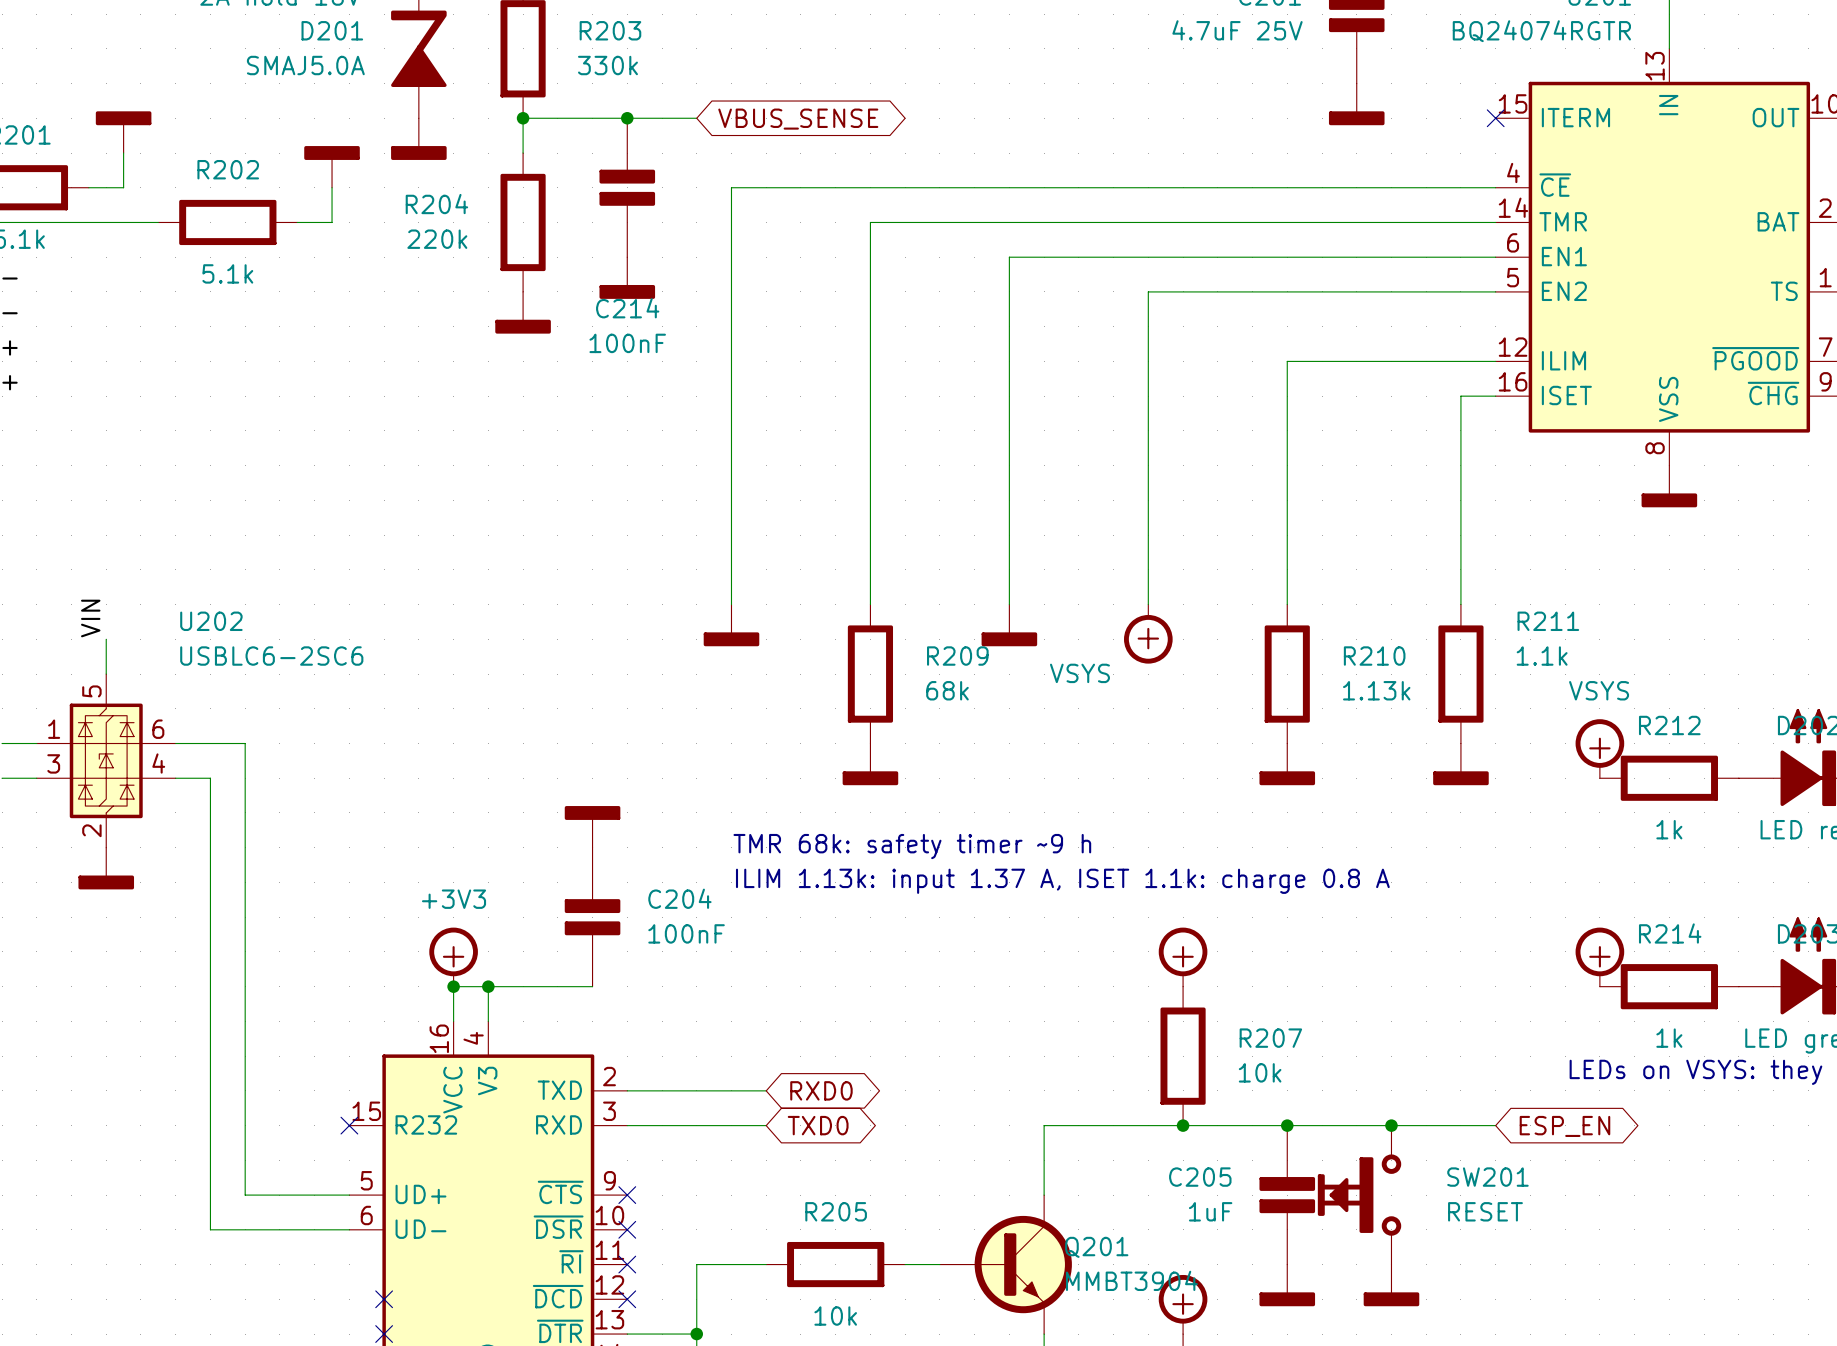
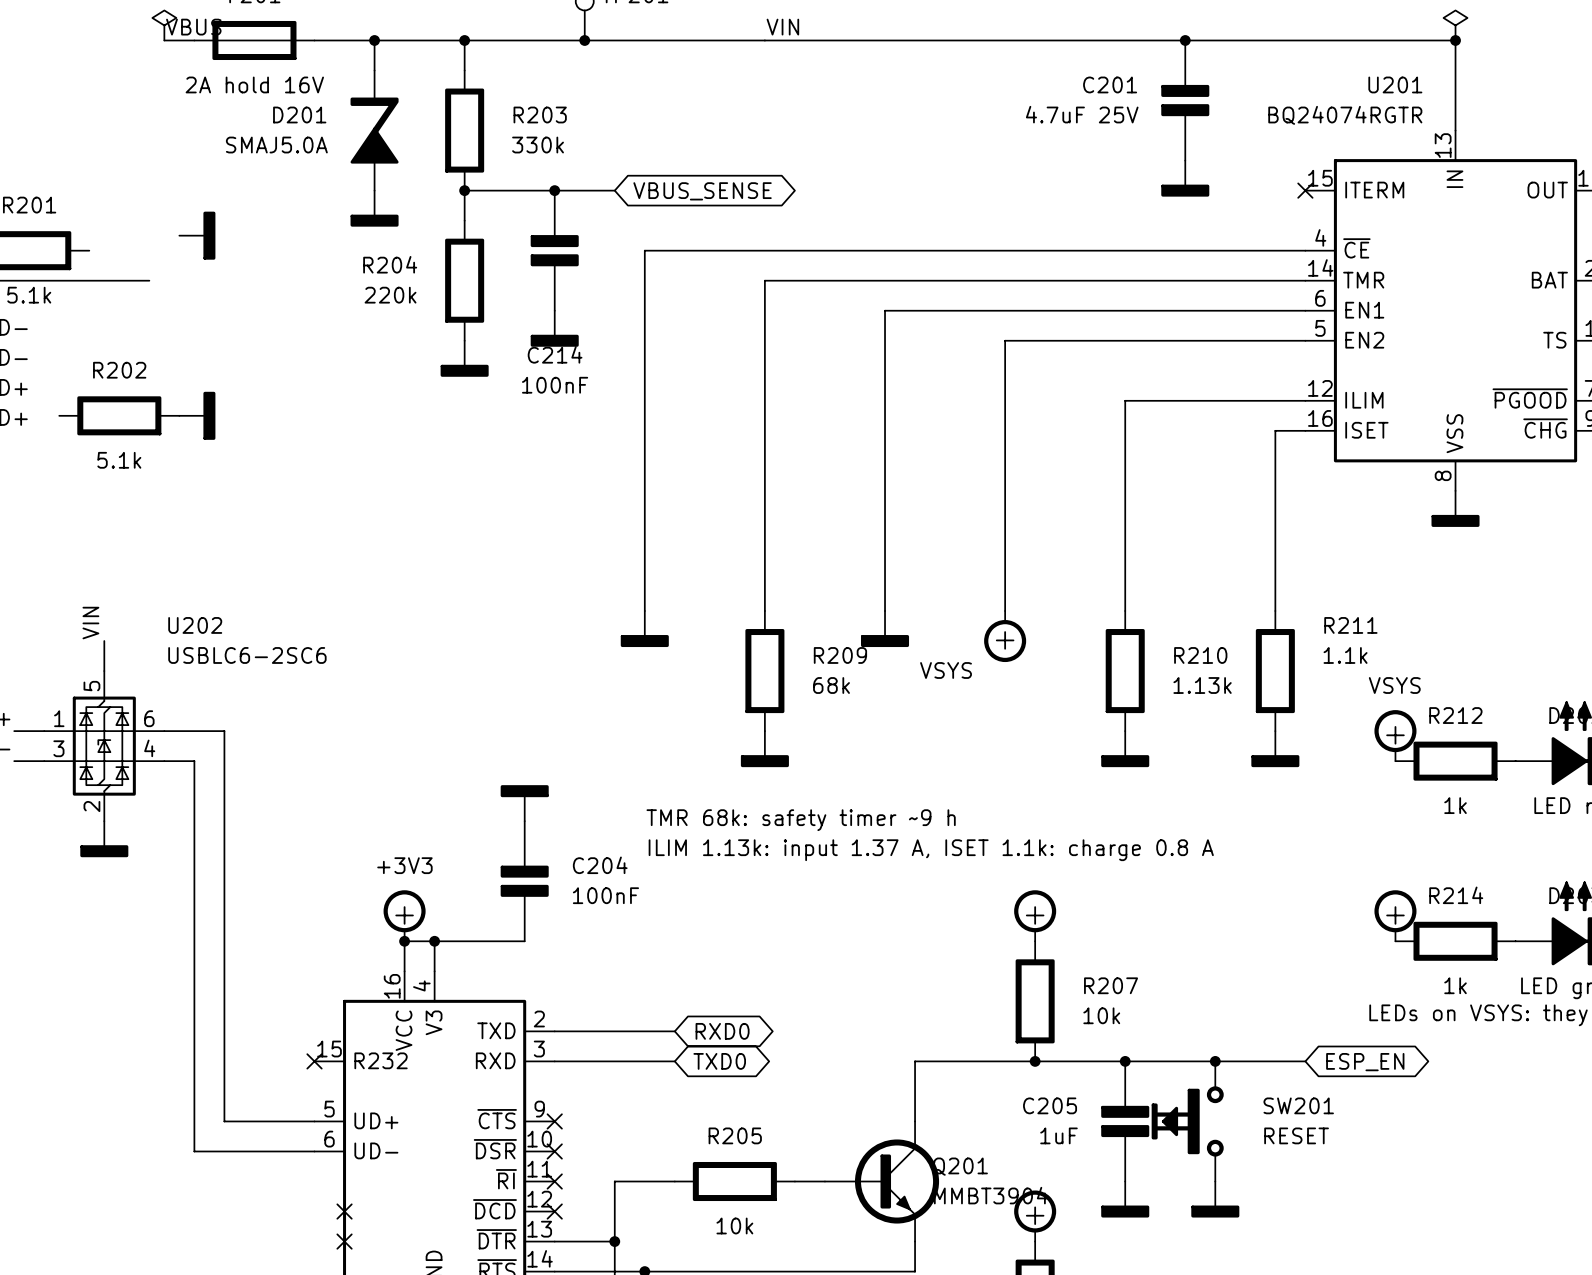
power symbol: (123, 132) -> none
wire: (123, 153) (123, 187) (88, 187) -> none
power symbol: (332, 166) -> none
power symbol: none -> (197, 235)
wire: (332, 187) (332, 222) (297, 222) -> none
R202 position: (227, 222) -> (119, 415)
power symbol: none -> (197, 415)

